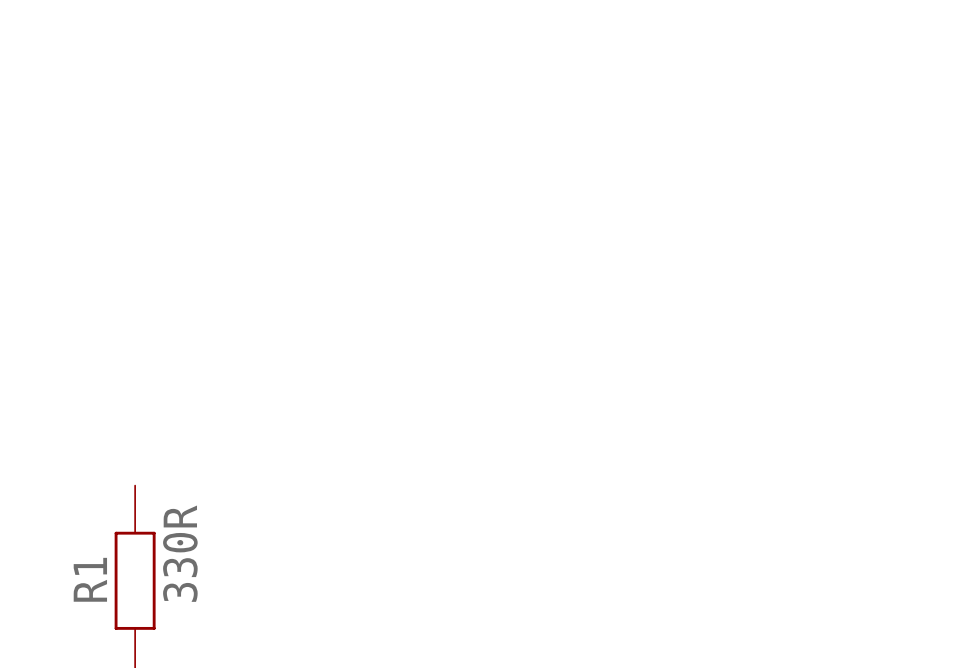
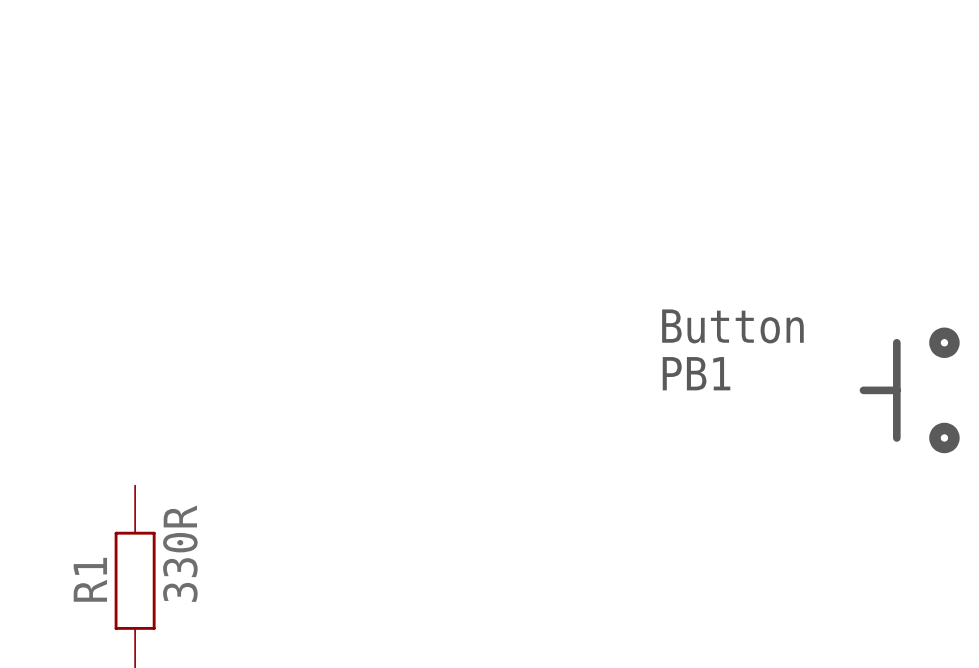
text: none -> Button (732, 326)
drawing: none -> [929, 327, 960, 359]
line: none -> (896, 342) (896, 437)
text: none -> PB1 (696, 373)
line: none -> (863, 390) (896, 390)
drawing: none -> [929, 422, 960, 454]

